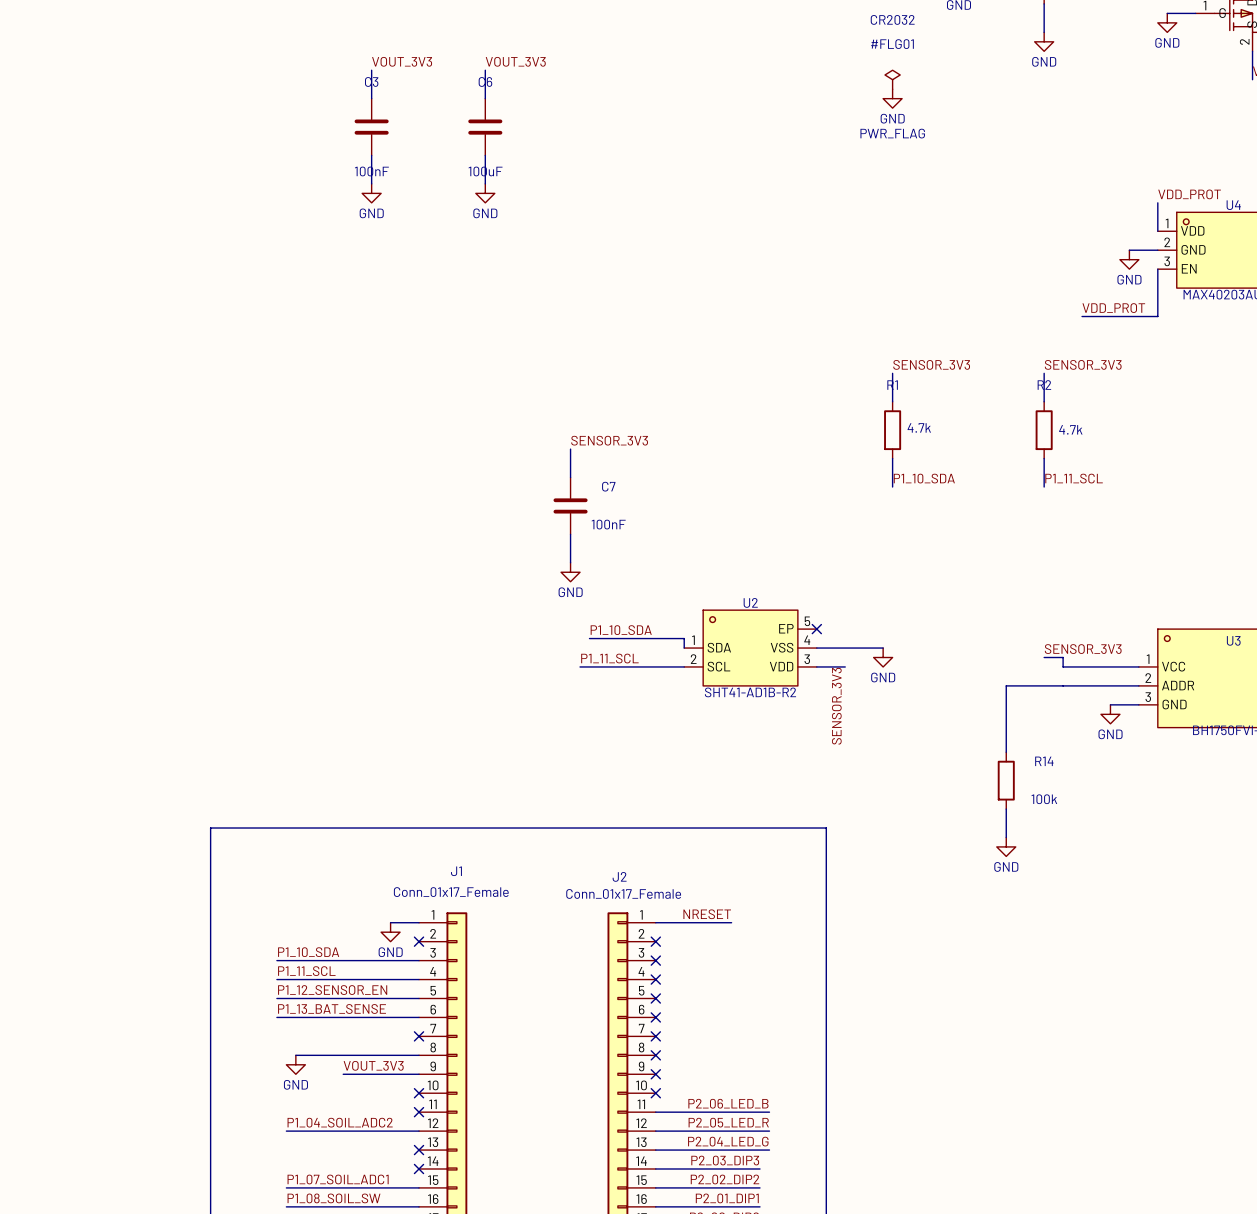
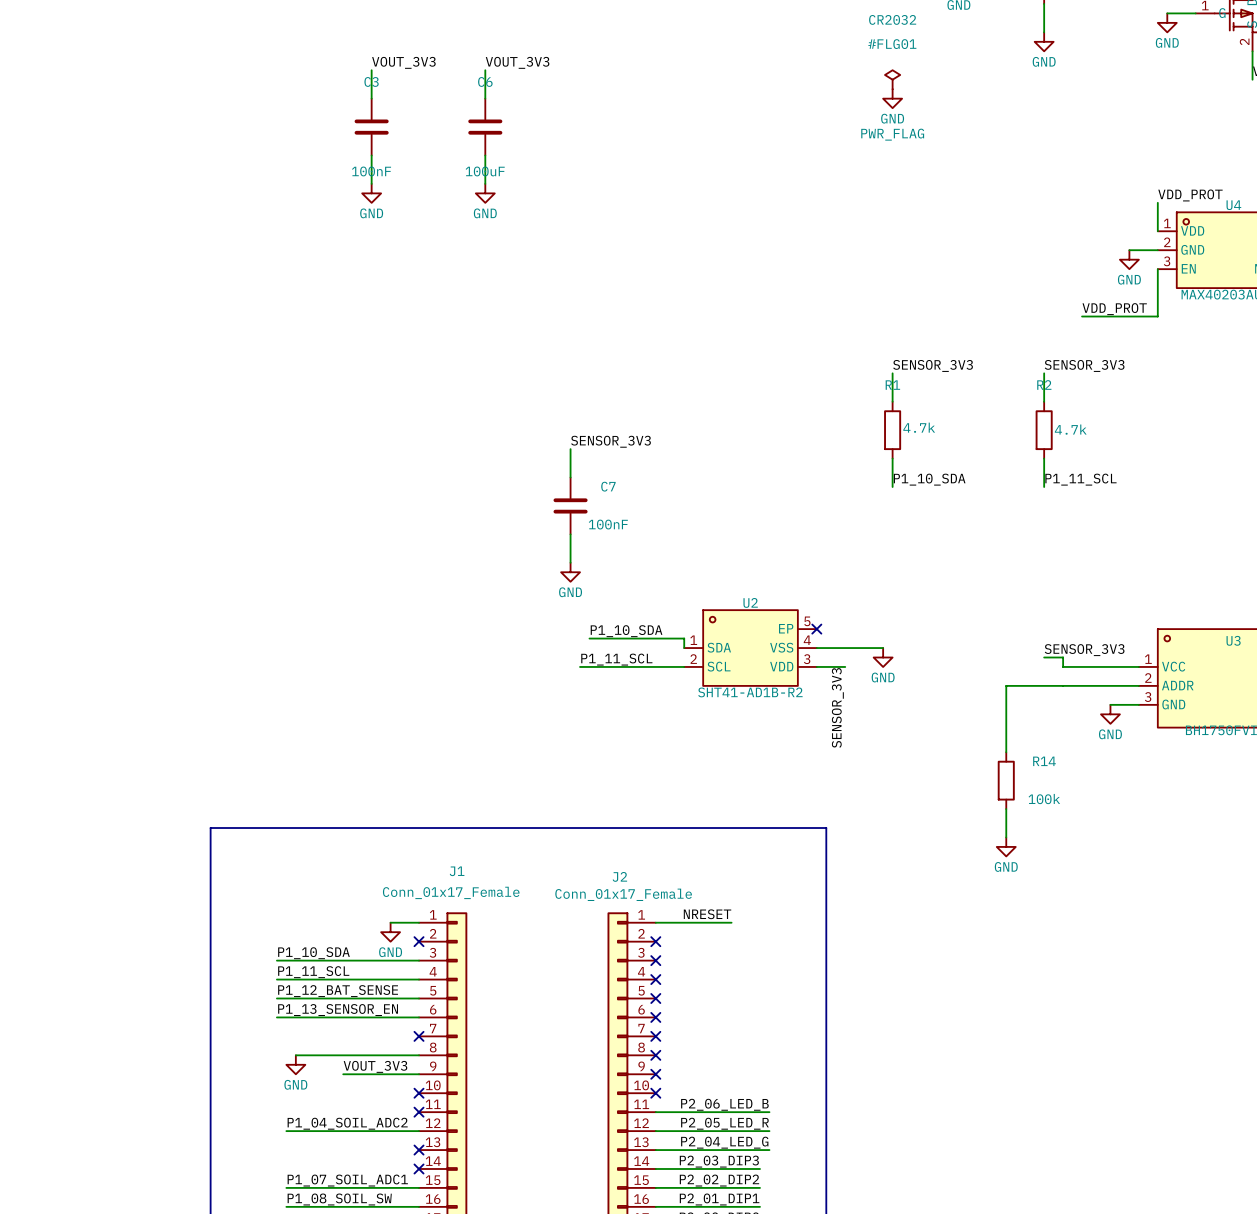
label: P1_12_SENSOR_EN (332, 990) -> P1_12_BAT_SENSE (338, 991)
label: P1_13_BAT_SENSE (332, 1008) -> P1_13_SENSOR_EN (338, 1010)

